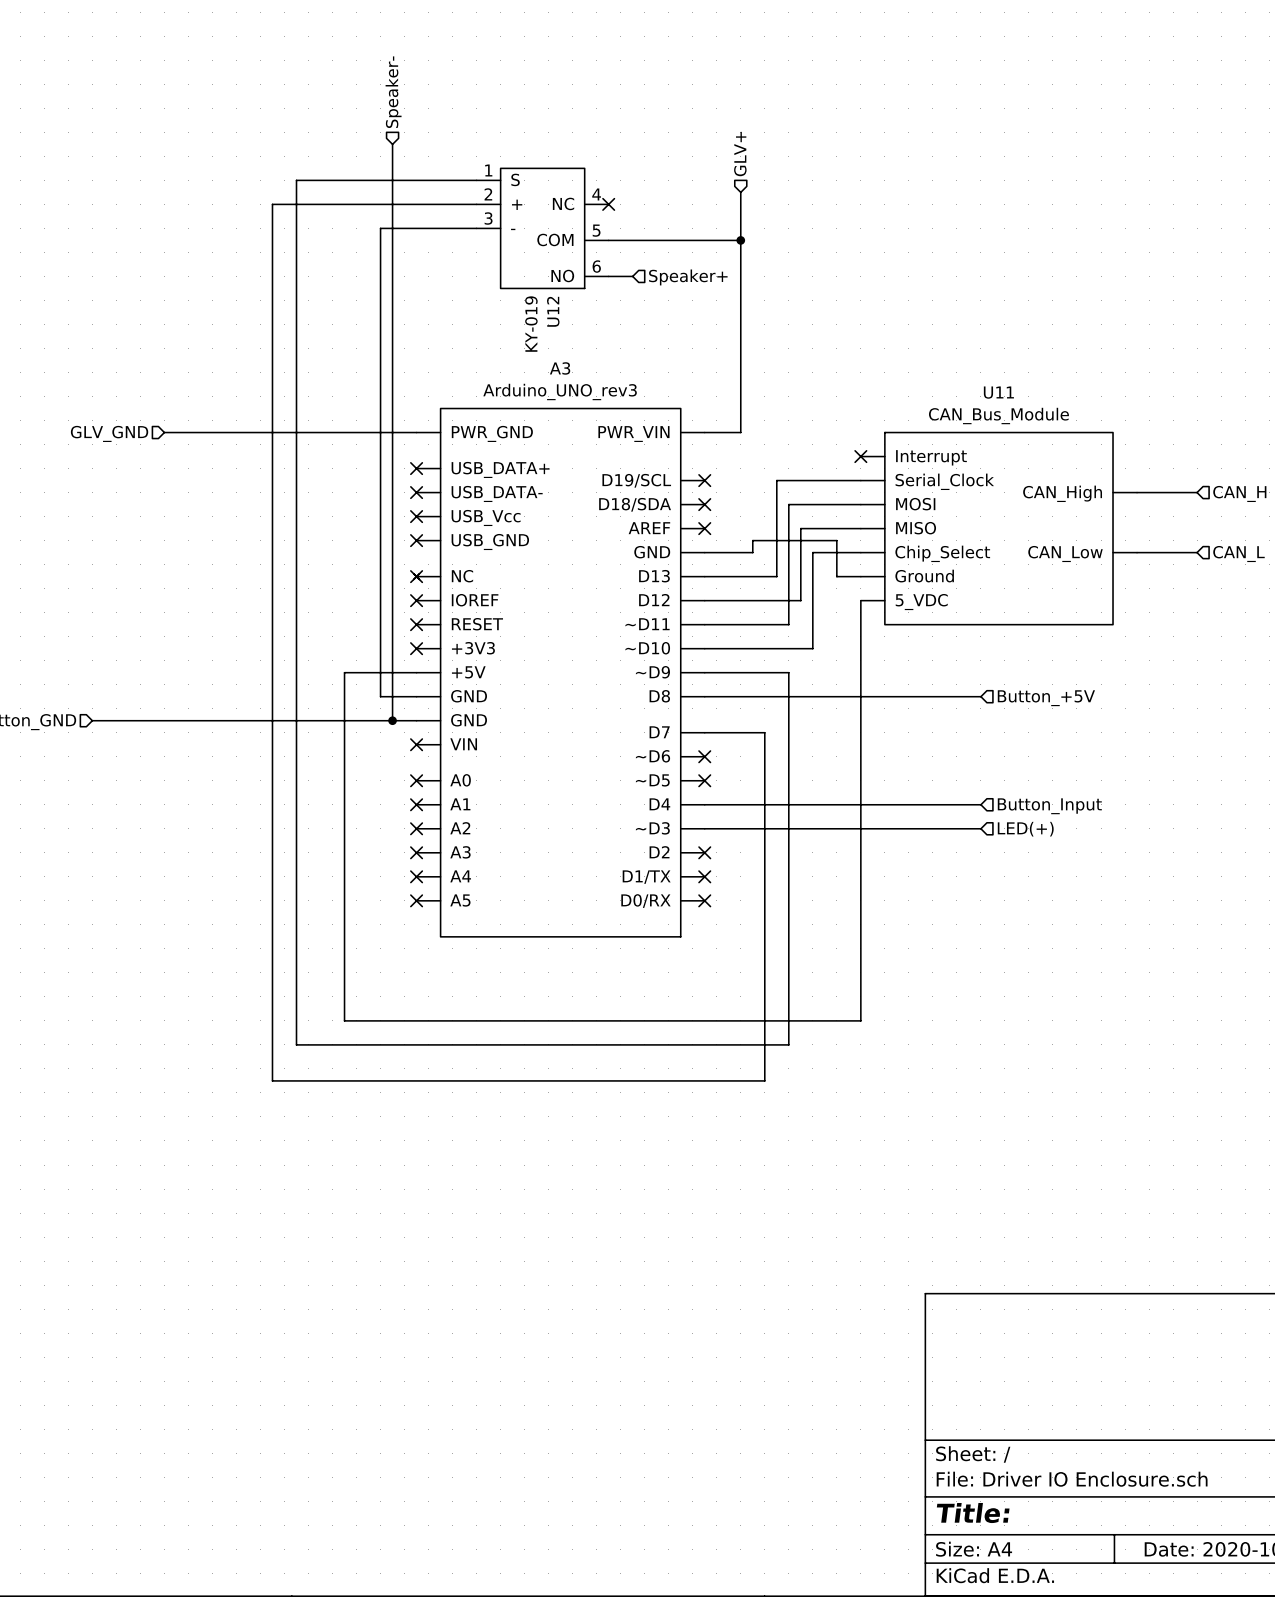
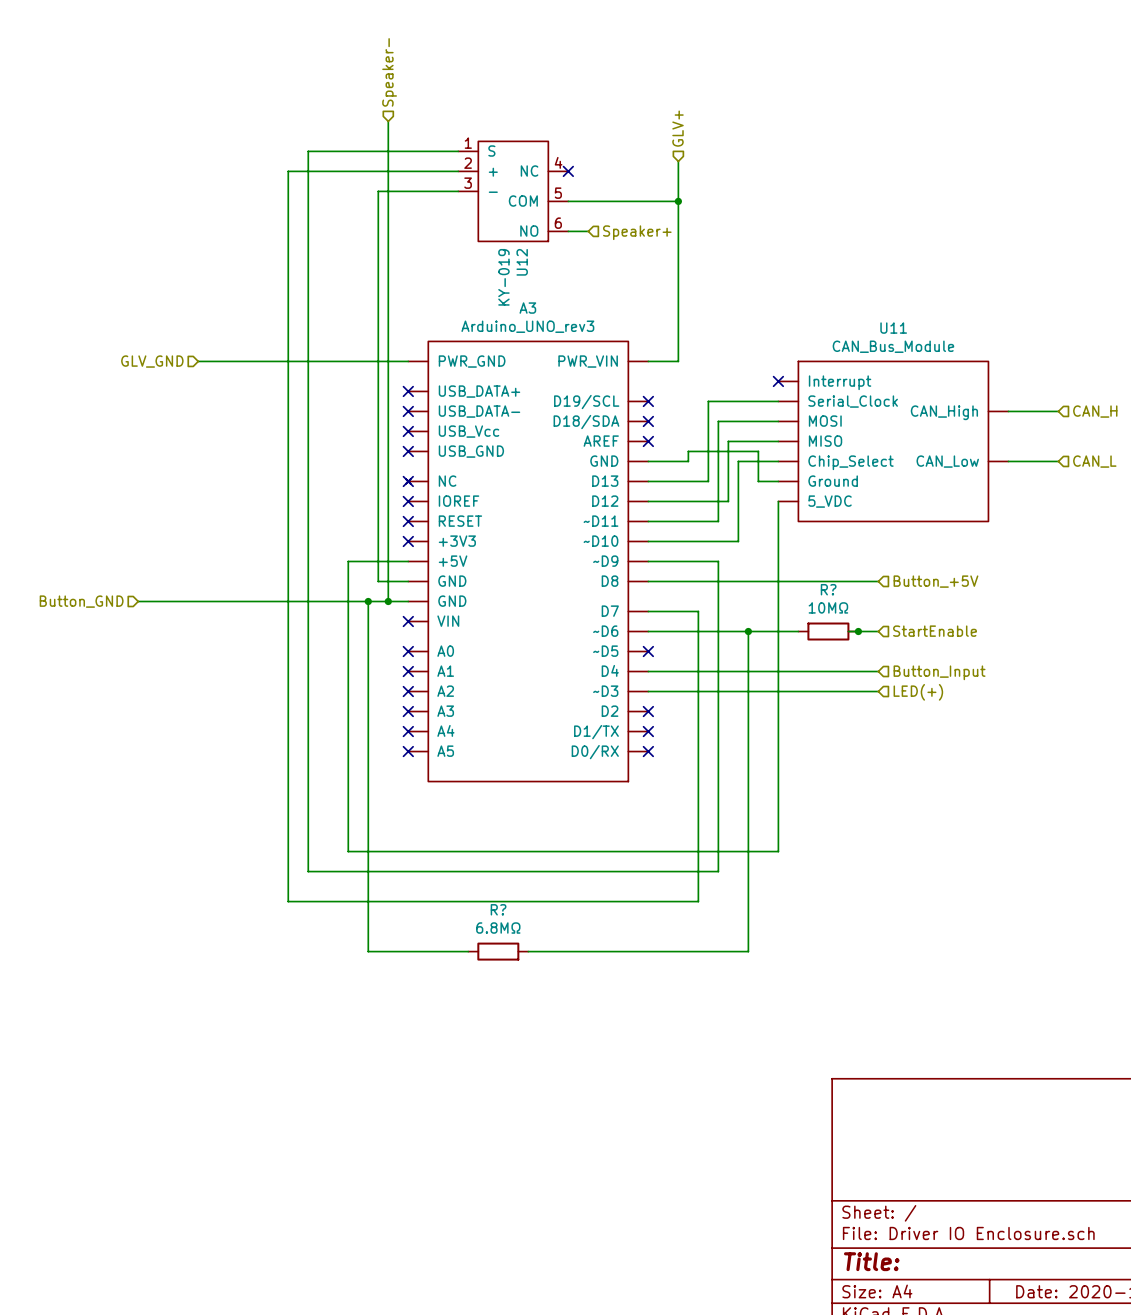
wire: none -> (368, 601) (368, 951) (468, 951)
junction: none -> (368, 601)
wire: none -> (648, 631) (798, 631)
no-connect mark: (704, 756) -> none
wire: none -> (748, 631) (748, 951) (528, 951)
junction: none -> (748, 631)
R?: none -> 10MΩ (828, 631)
wire: none -> (848, 631) (878, 631)
junction: none -> (858, 631)
hierarchical label: none -> StartEnable (935, 631)
R?: none -> 6.8MΩ (498, 951)

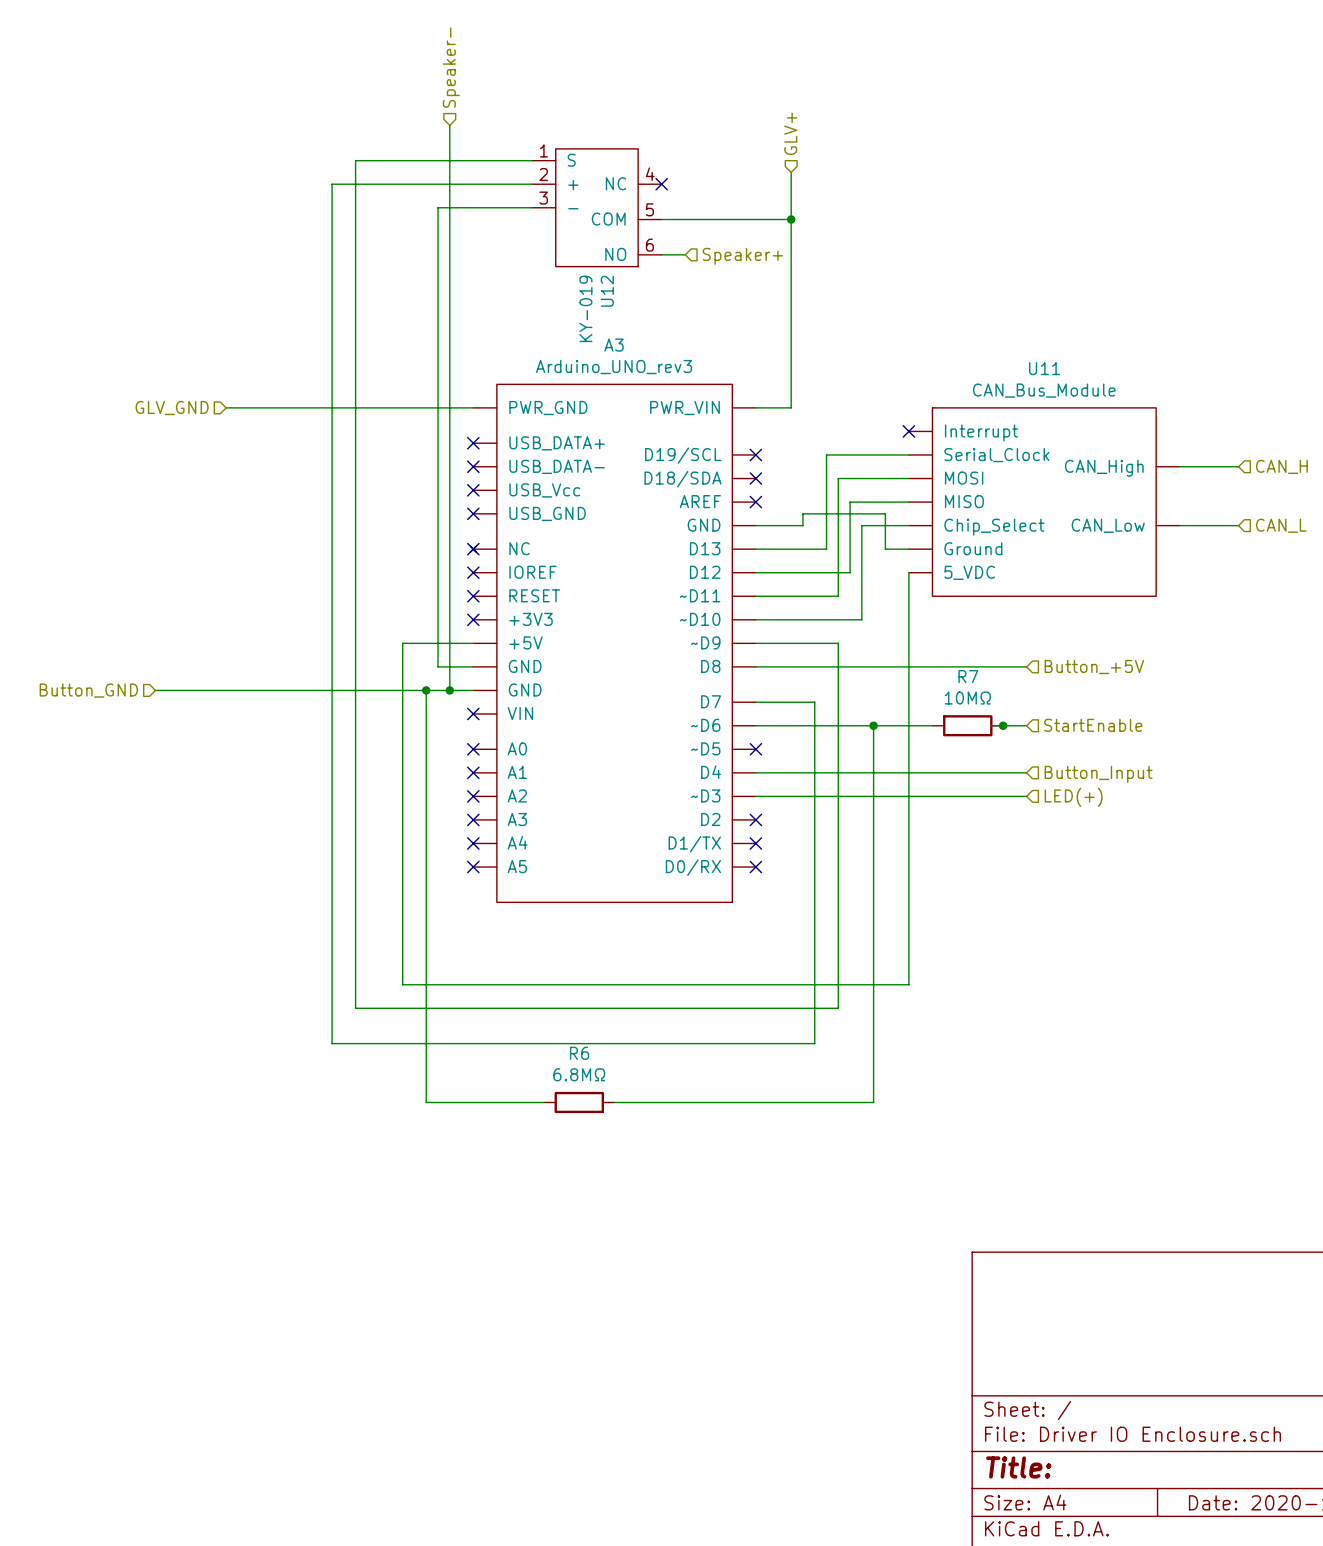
R? name: R? (828, 589) -> R7 (968, 676)
R? name: R? (498, 909) -> R6 (579, 1053)

